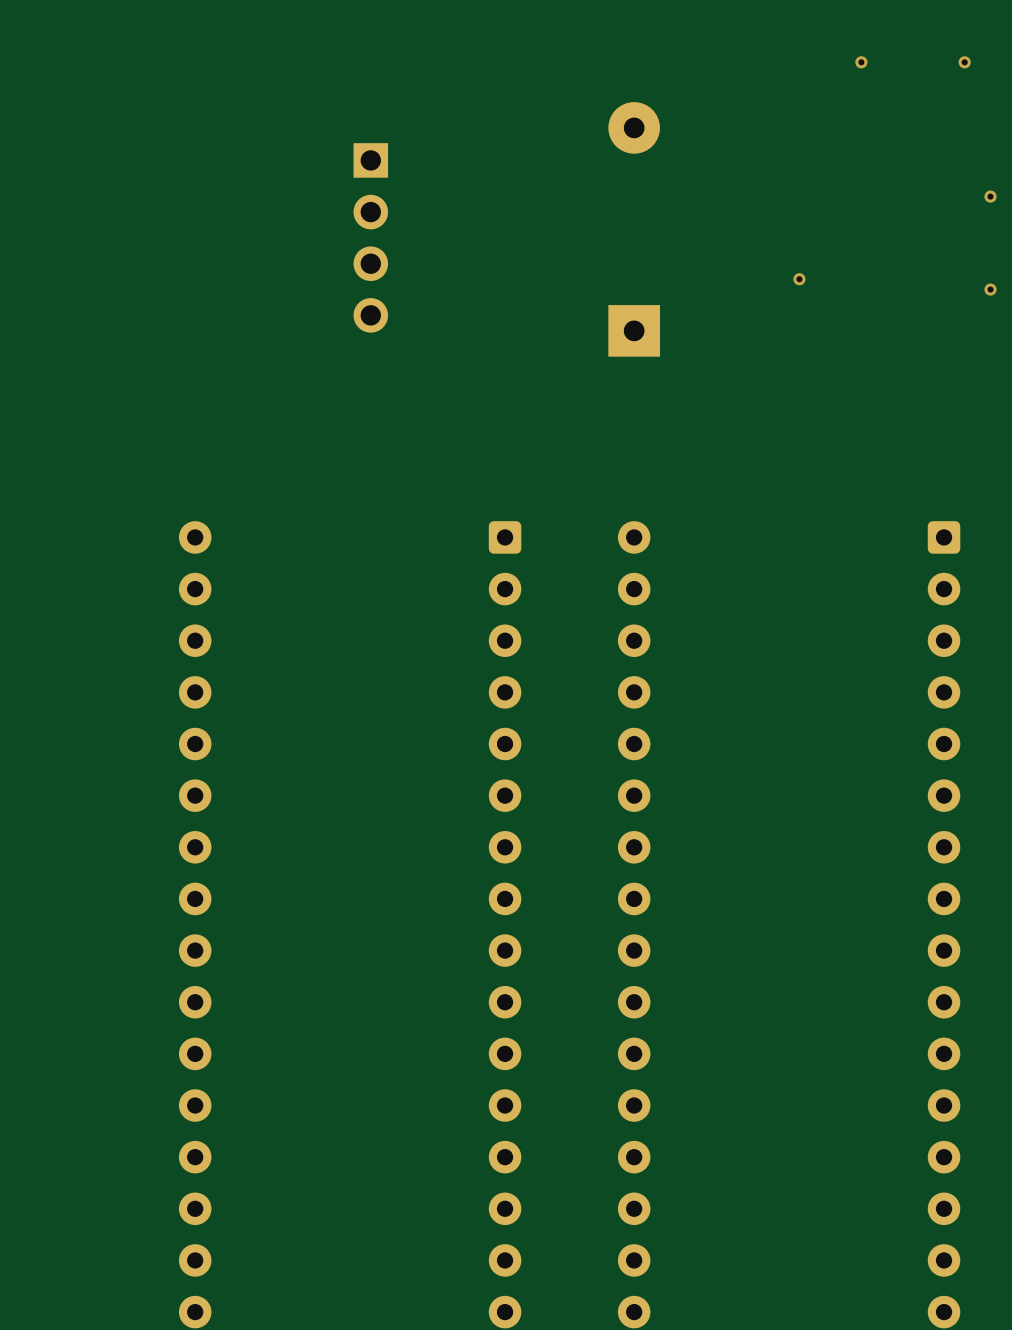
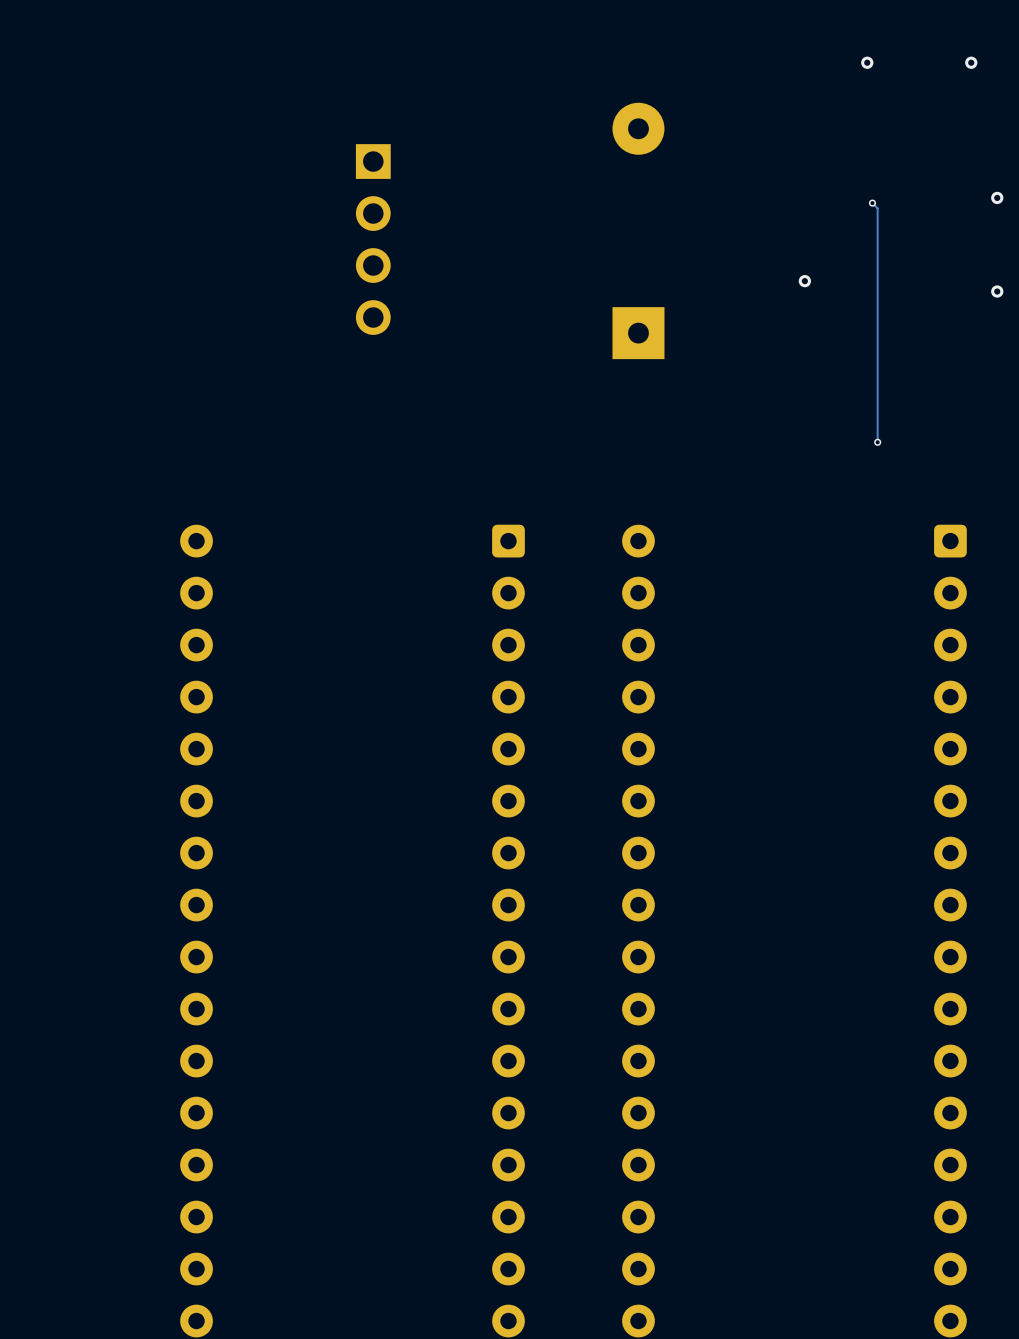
track: none -> (872, 203) (877, 208) (877, 442)
via: none -> (872, 203)
via: none -> (877, 442)

